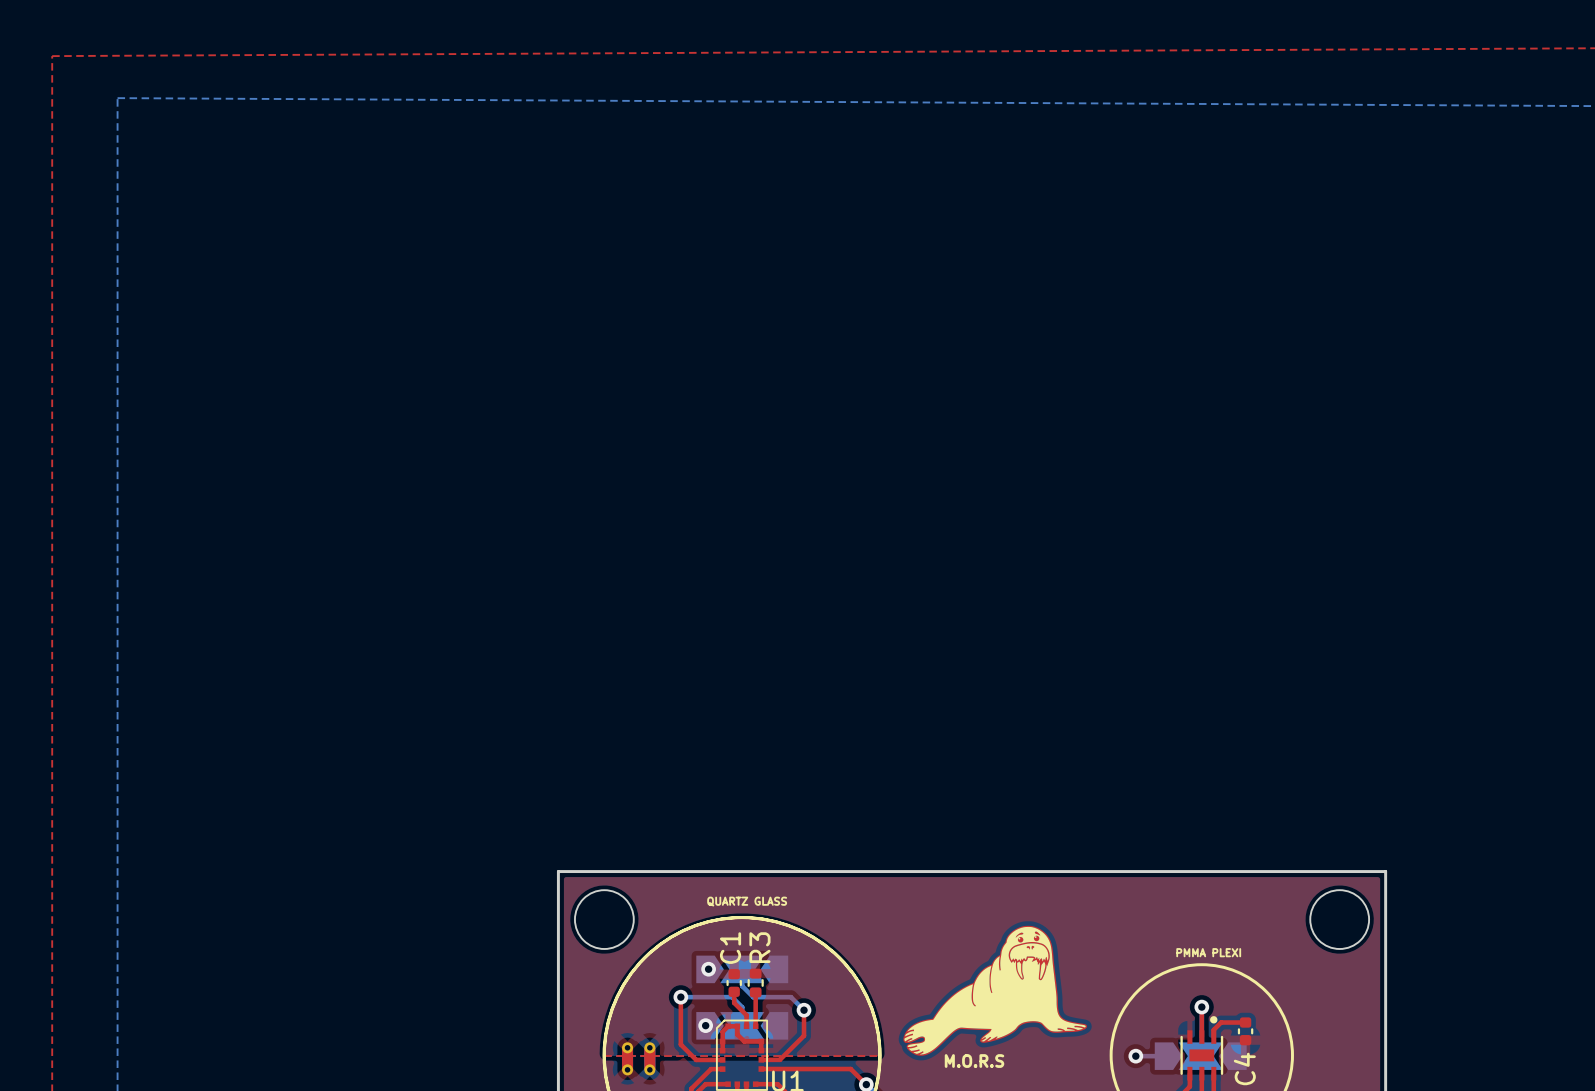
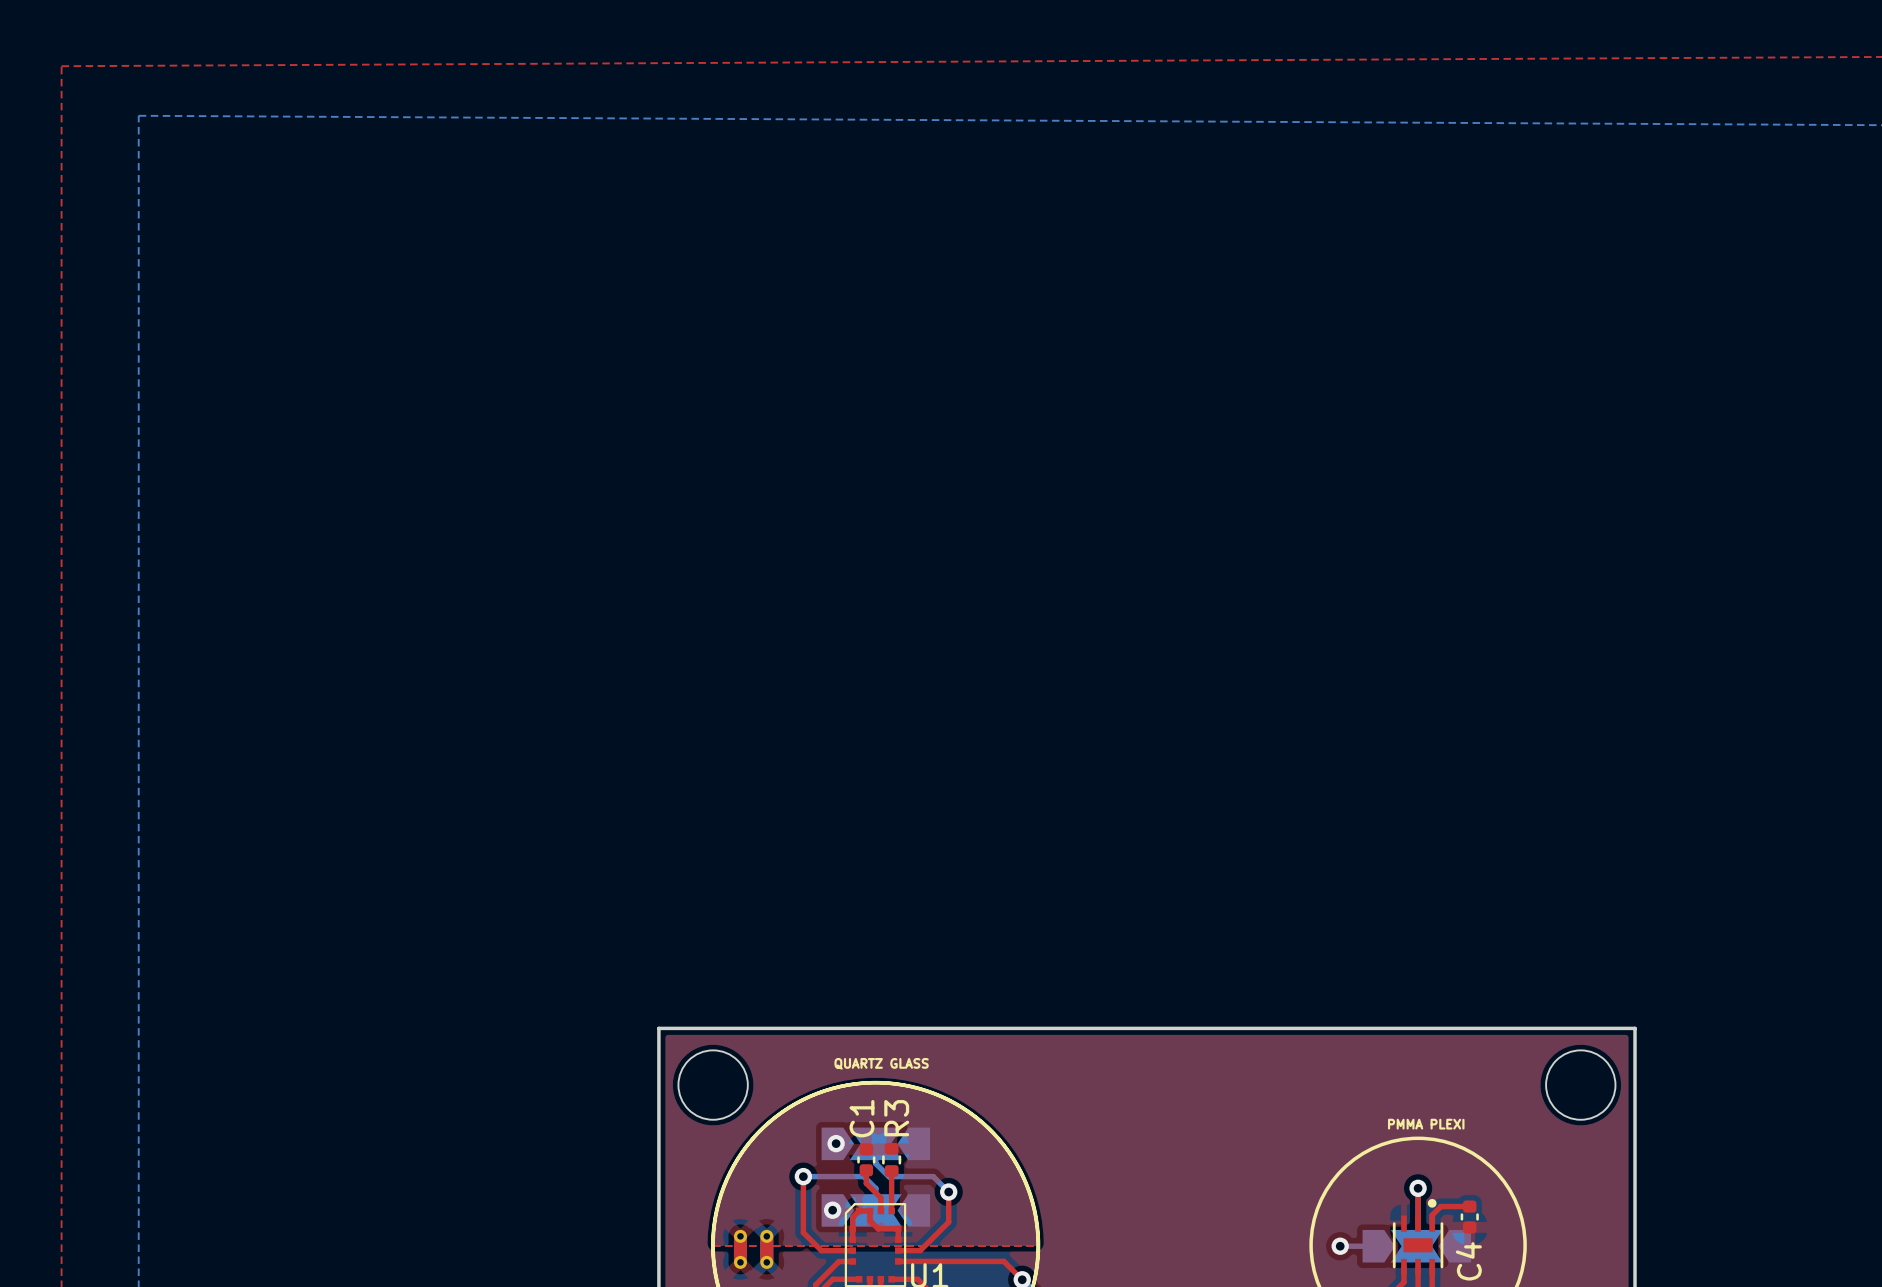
drawing: [903, 925, 1088, 1056] -> none
text: M.O.R.S (974, 1061) -> none

